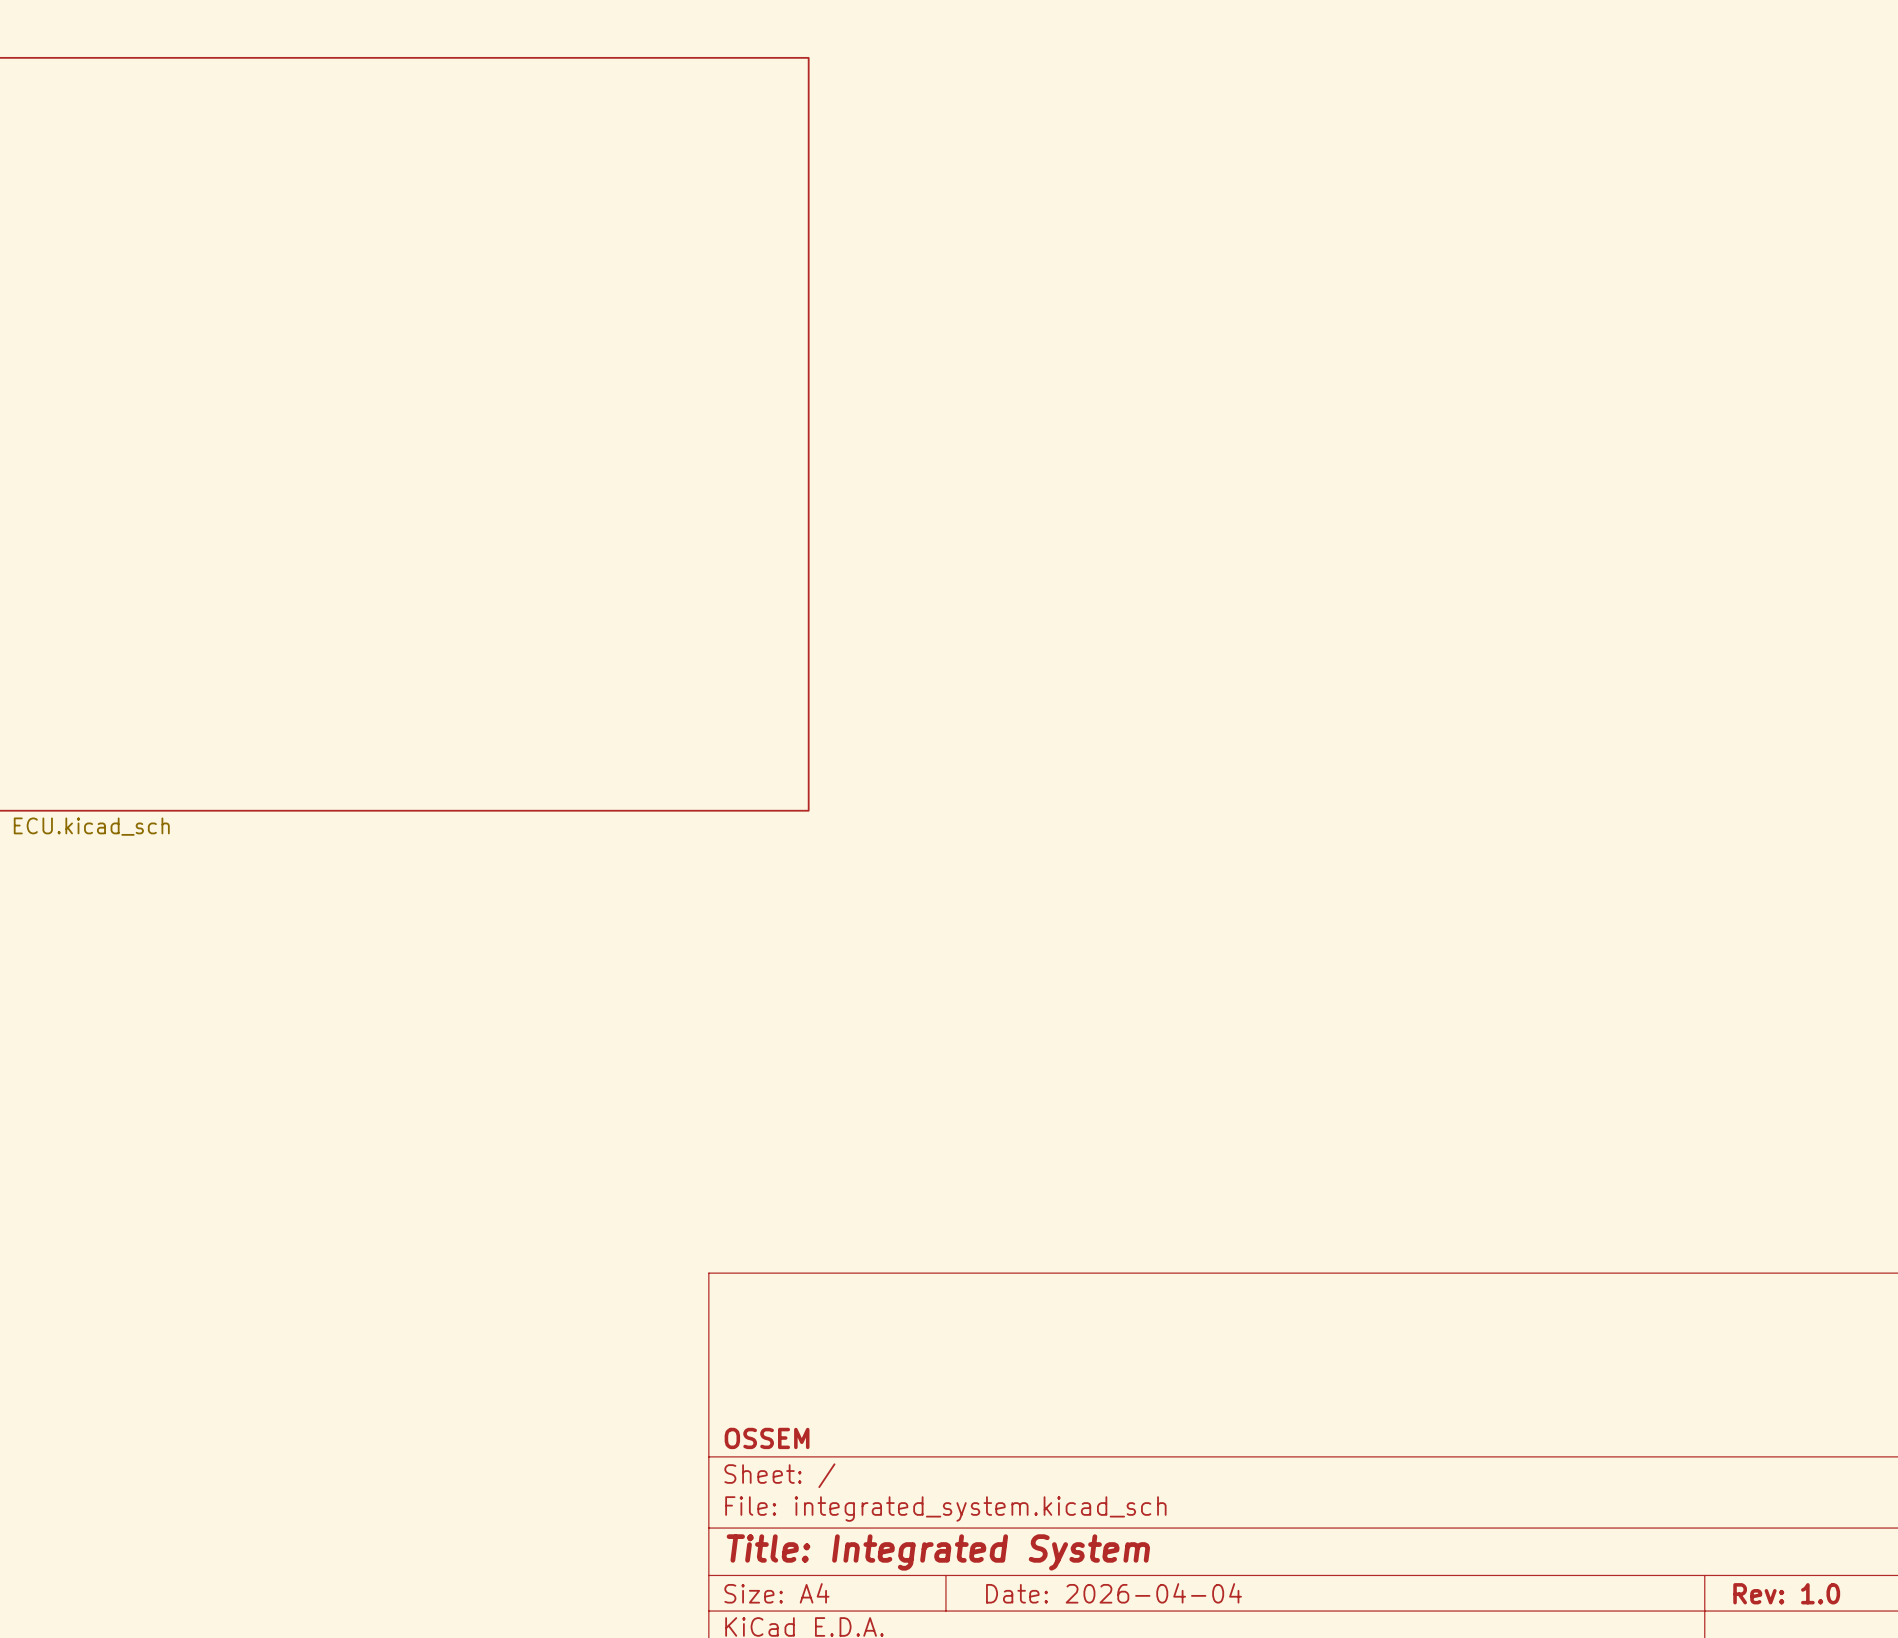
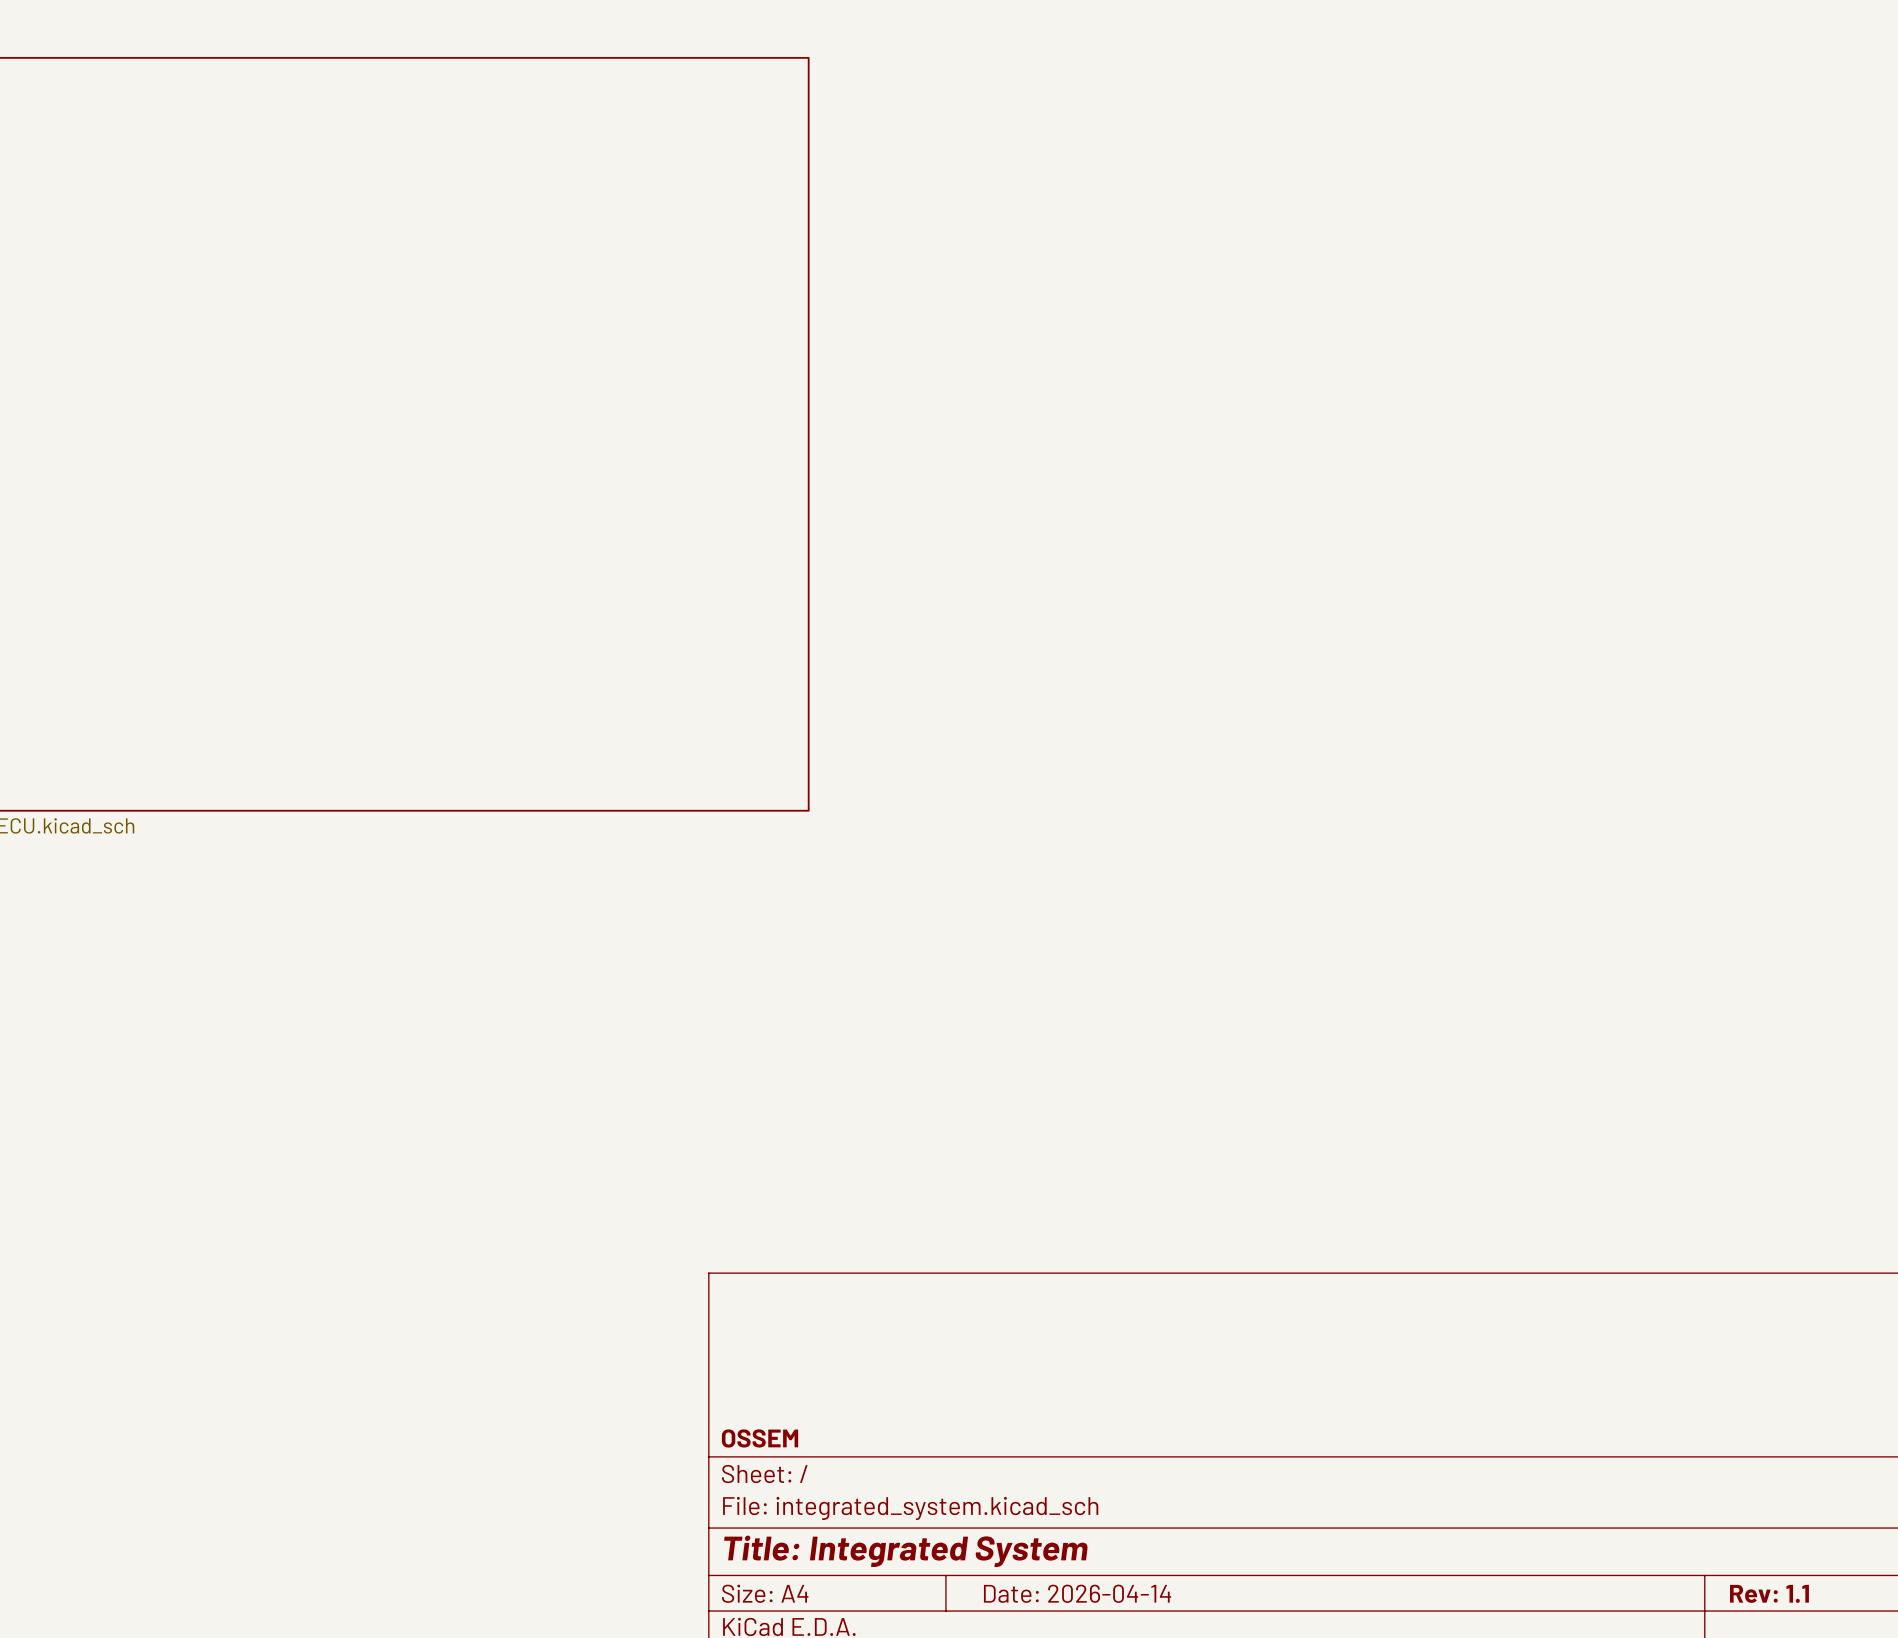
title block: Date: 2026-04-04 (1113, 1593) -> Date: 2026-04-14 (1077, 1593)
title block: Rev: 1.0 (1786, 1593) -> Rev: 1.1 (1769, 1593)

